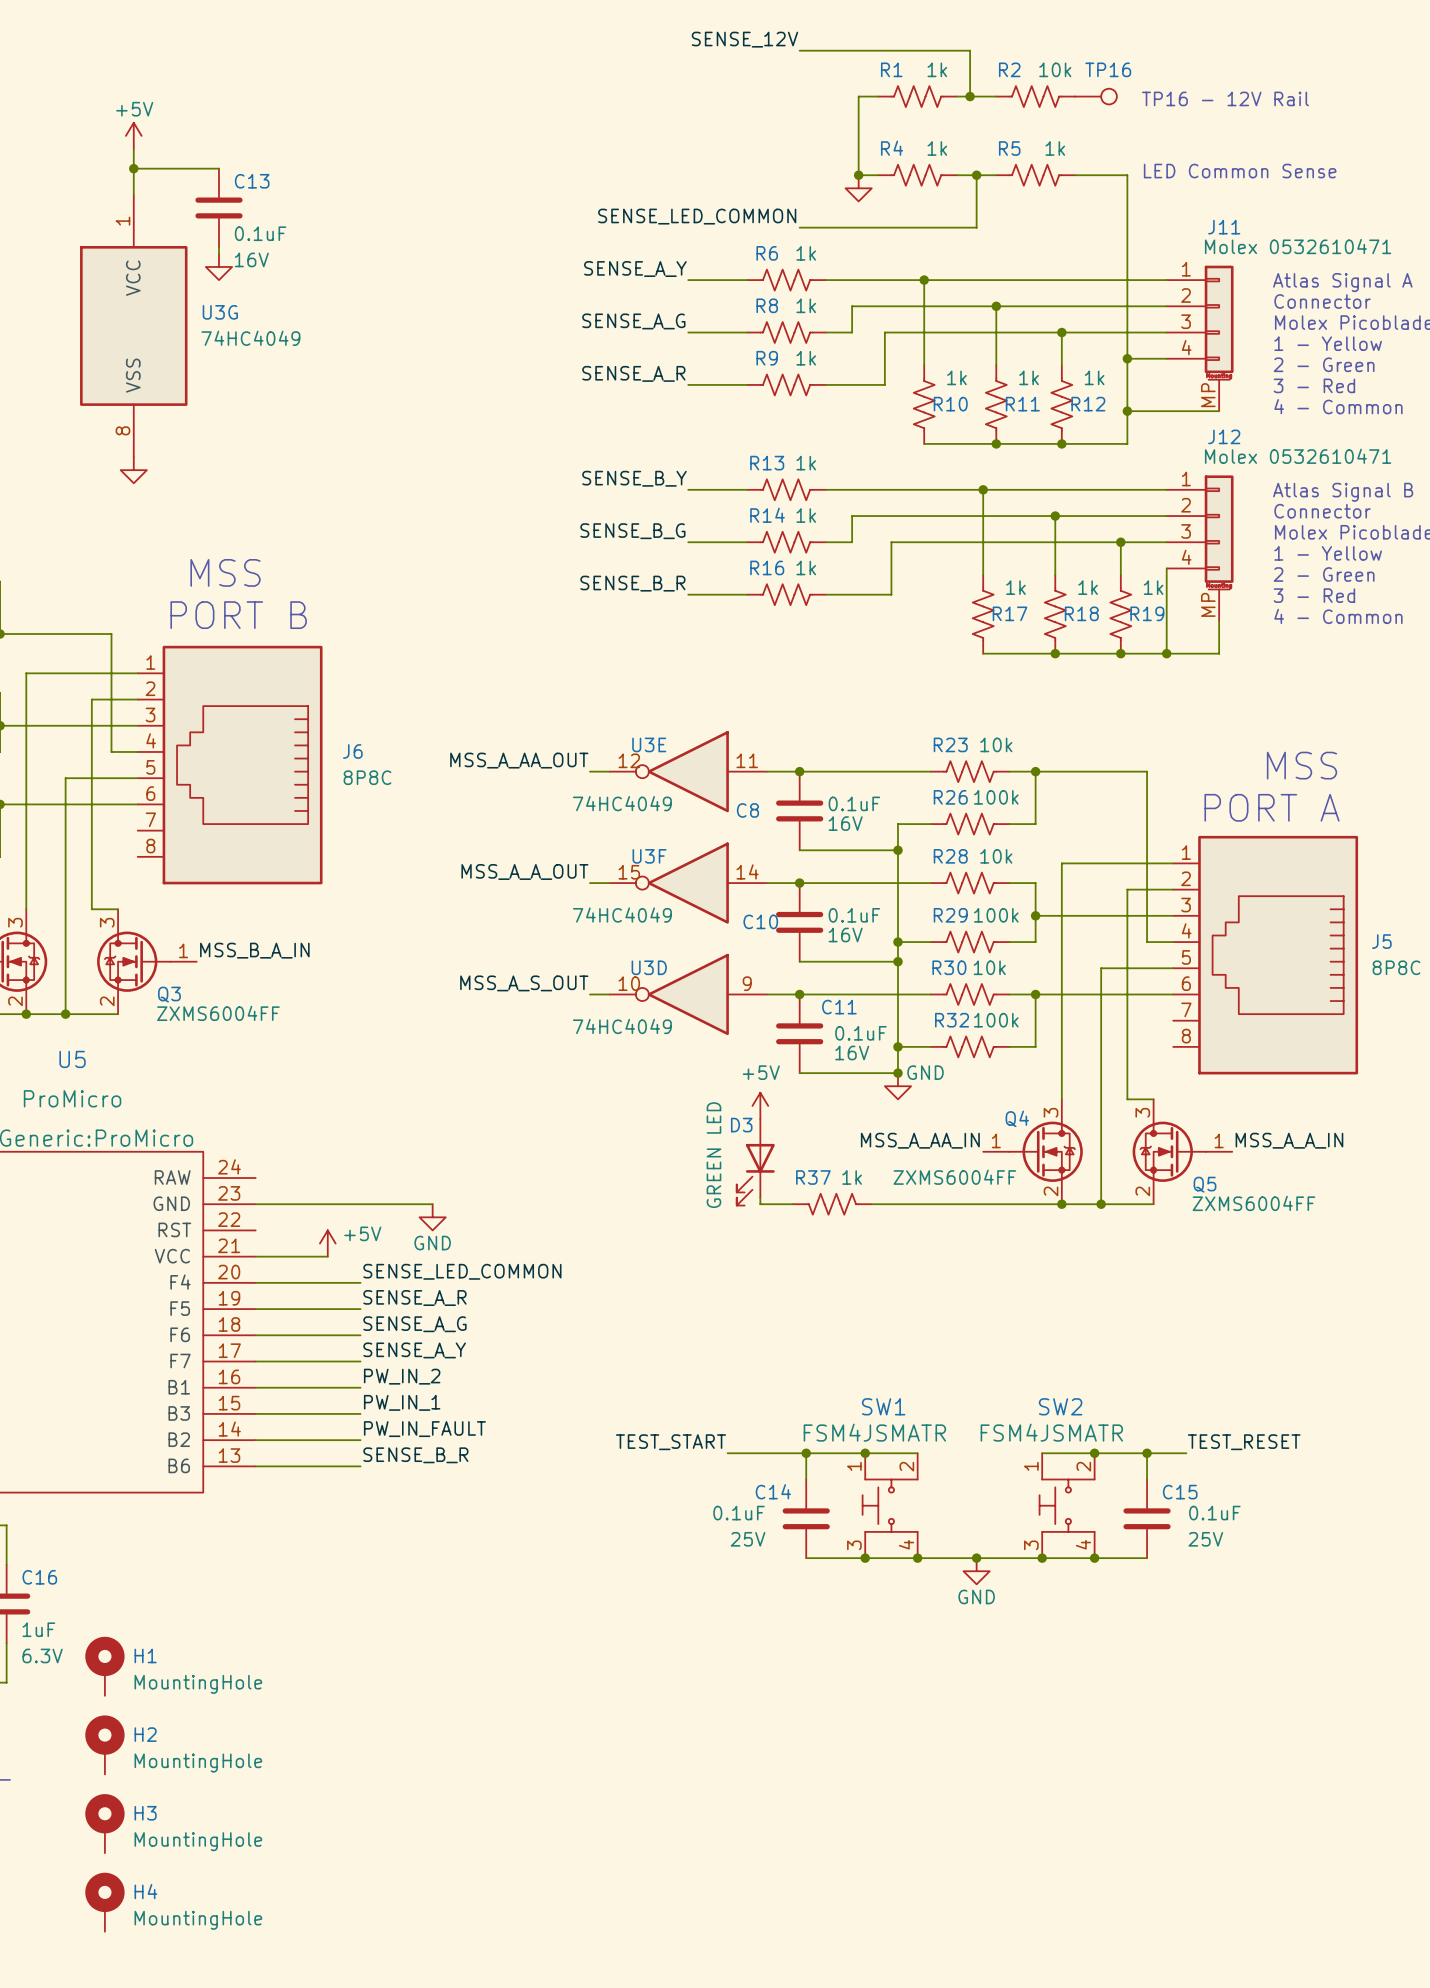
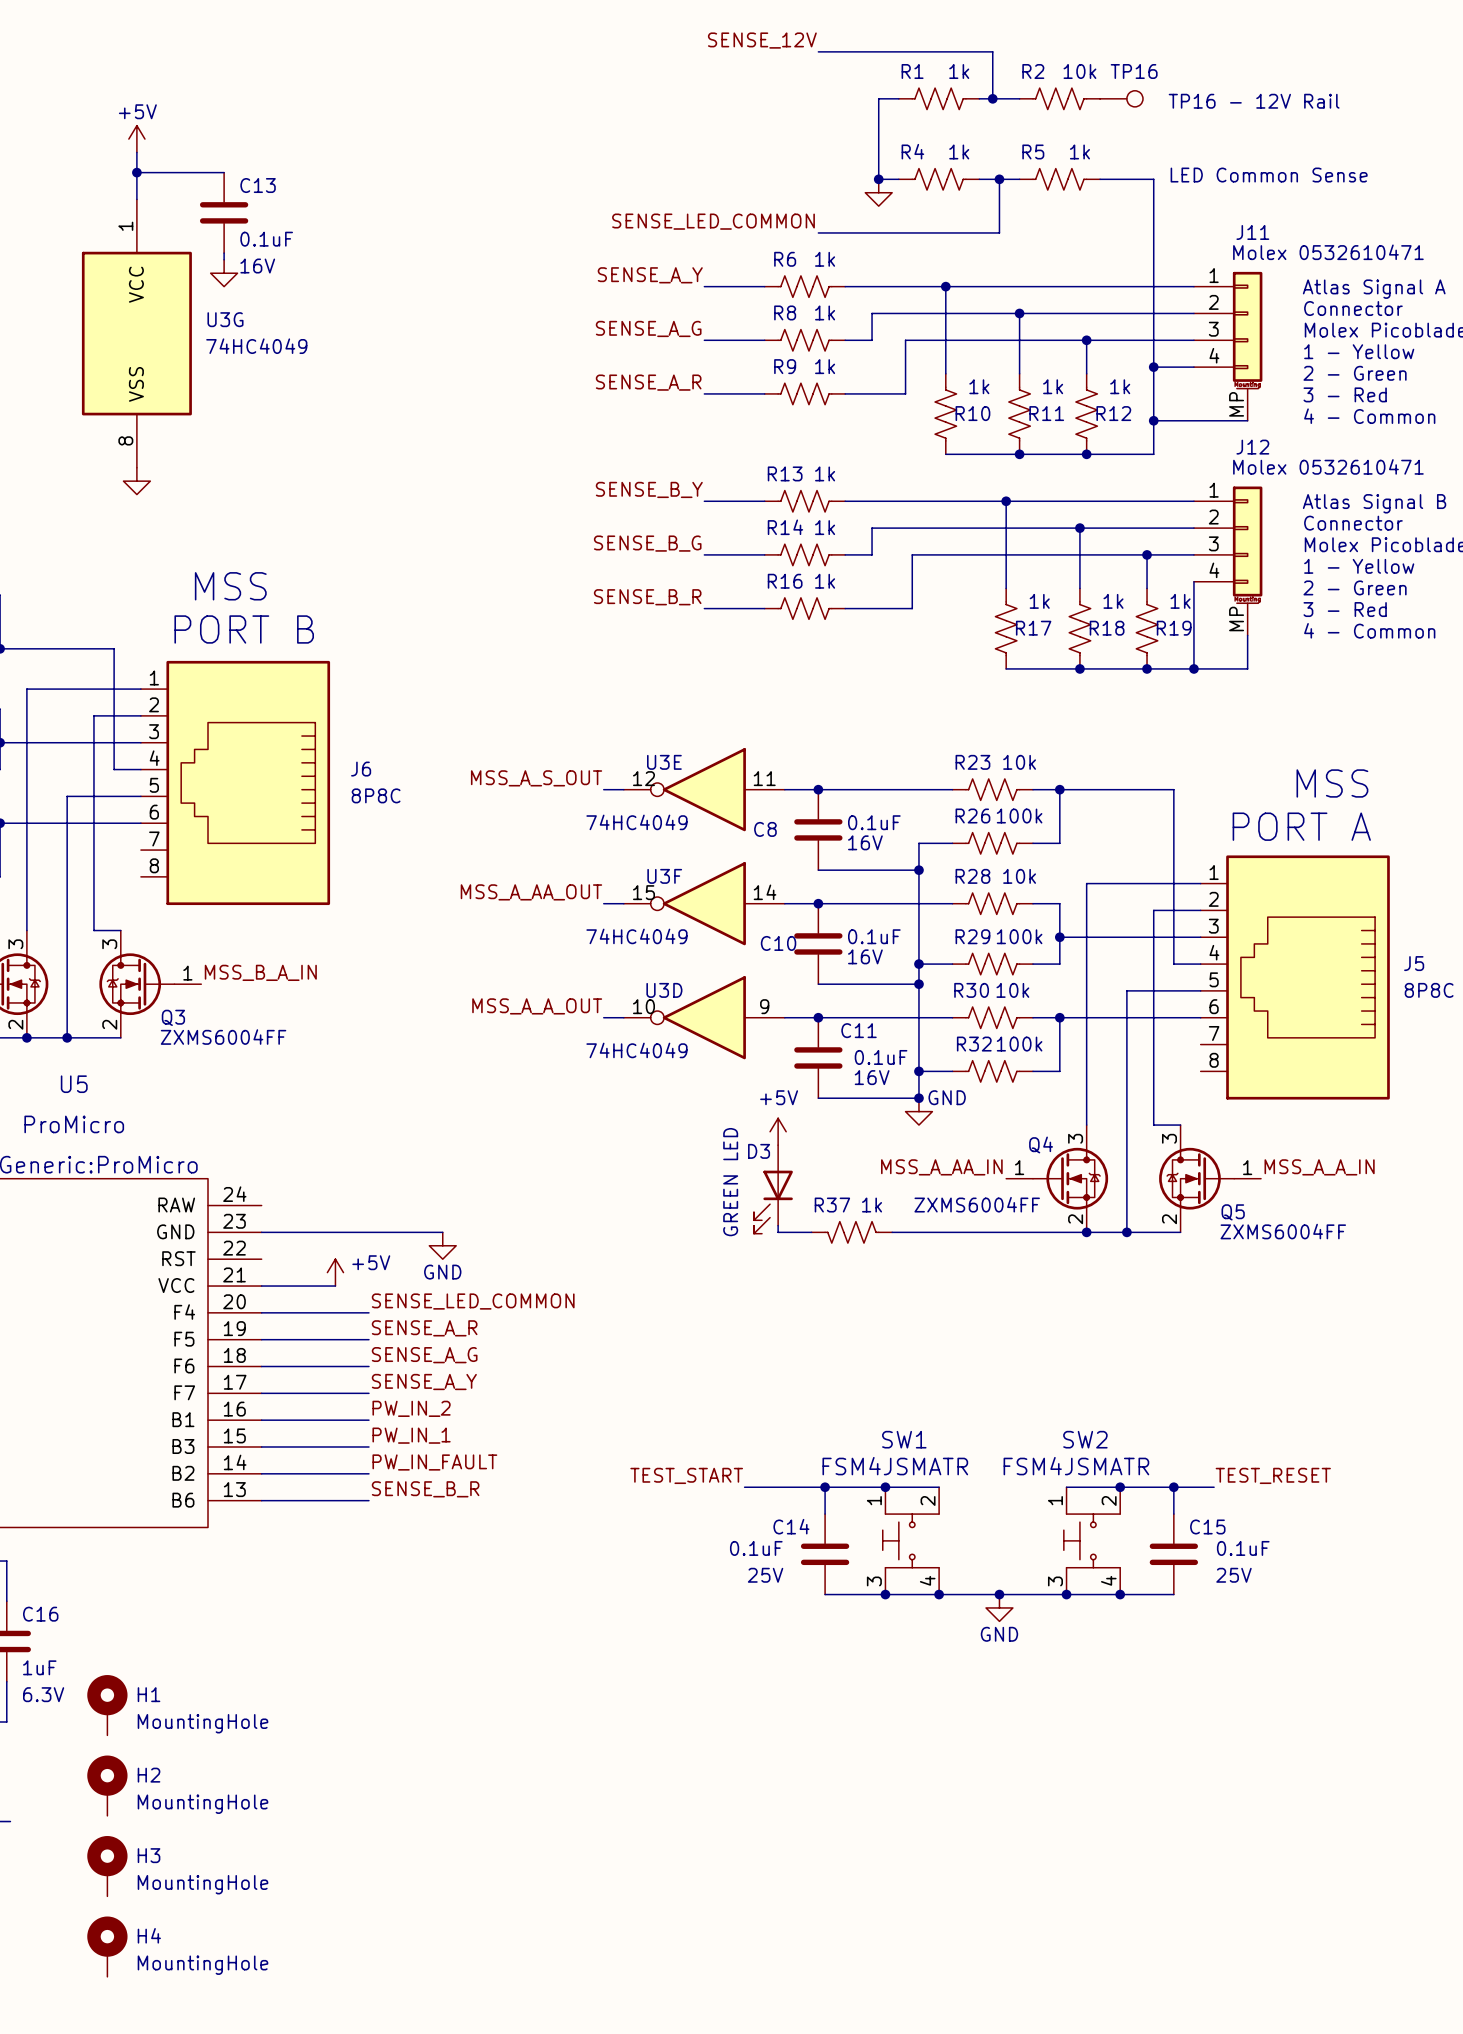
label: MSS_A_AA_OUT (519, 760) -> MSS_A_S_OUT (536, 778)
label: MSS_A_A_OUT (524, 871) -> MSS_A_AA_OUT (531, 892)
label: MSS_A_S_OUT (524, 983) -> MSS_A_A_OUT (537, 1006)

